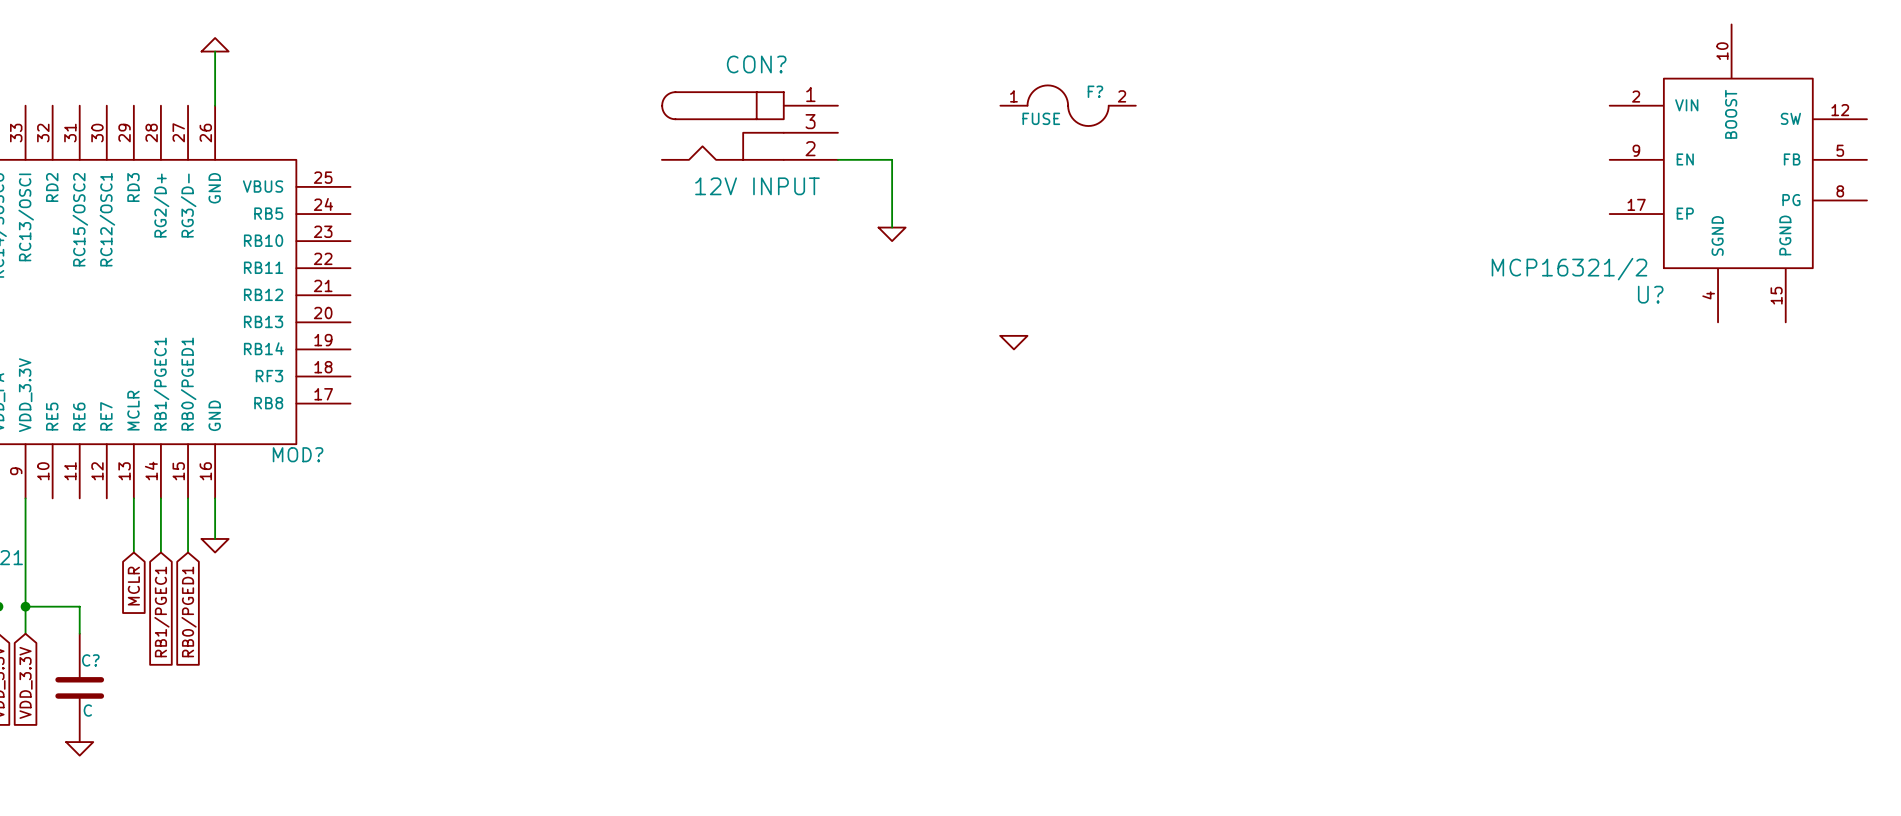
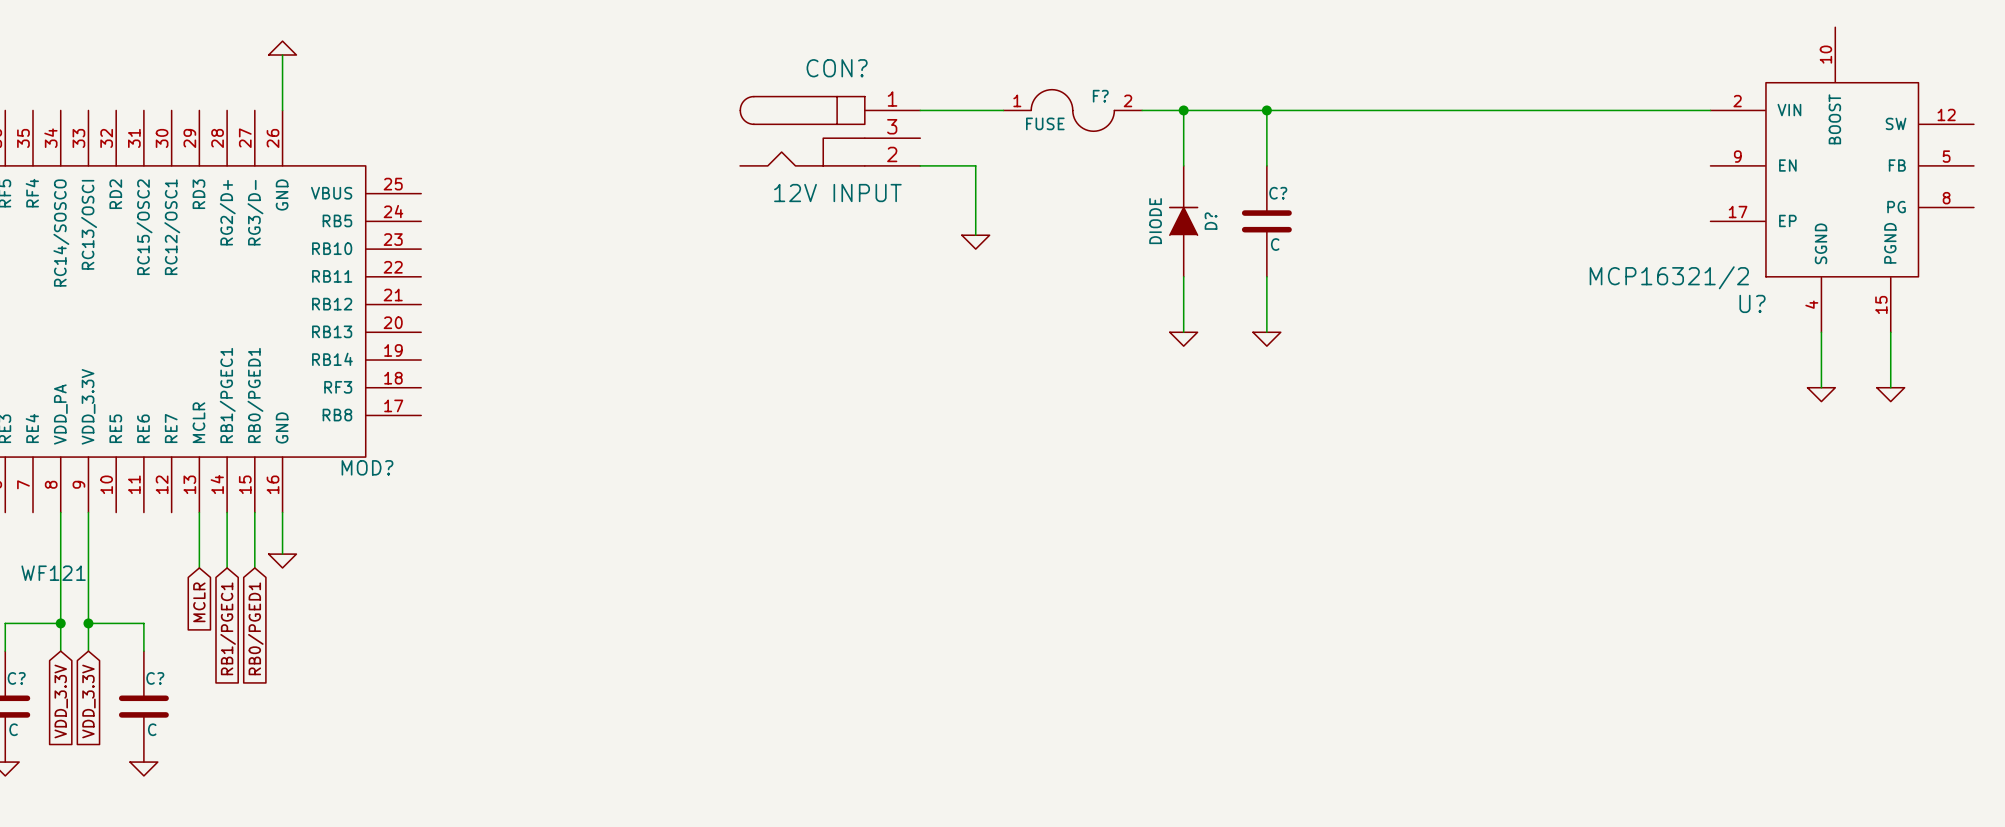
wire: none -> (920, 110) (1003, 110)
wire: none -> (1142, 110) (1710, 110)
F? position: (1068, 105) -> (1072, 110)
wire: none -> (1183, 110) (1183, 165)
junction: none -> (1183, 110)
wire: none -> (1266, 110) (1266, 165)
junction: none -> (1266, 110)
D?: none -> DIODE (1183, 221)
C?: none -> C (1266, 221)
wire: none -> (1183, 276) (1183, 332)
wire: none -> (1266, 276) (1266, 332)
wire: none -> (1821, 332) (1821, 387)
wire: none -> (1890, 332) (1890, 387)
power symbol: none -> (1183, 339)
power symbol: none -> (1266, 339)
power symbol: (1013, 342) -> none
power symbol: none -> (1821, 394)
power symbol: none -> (1890, 394)

